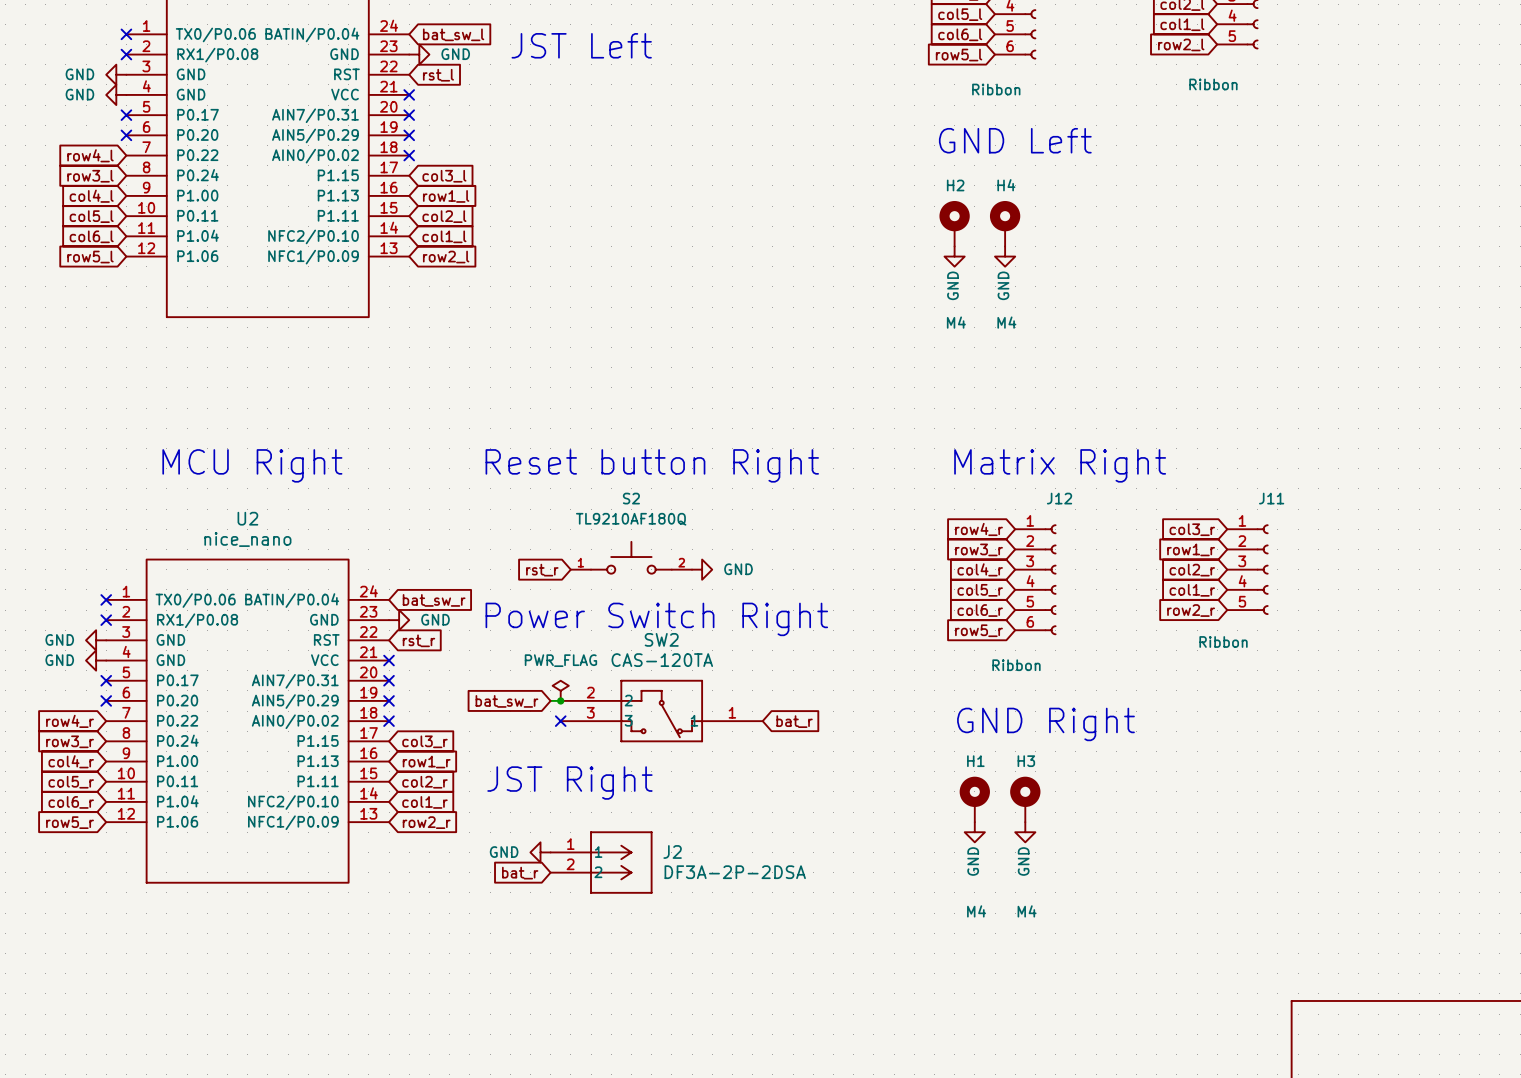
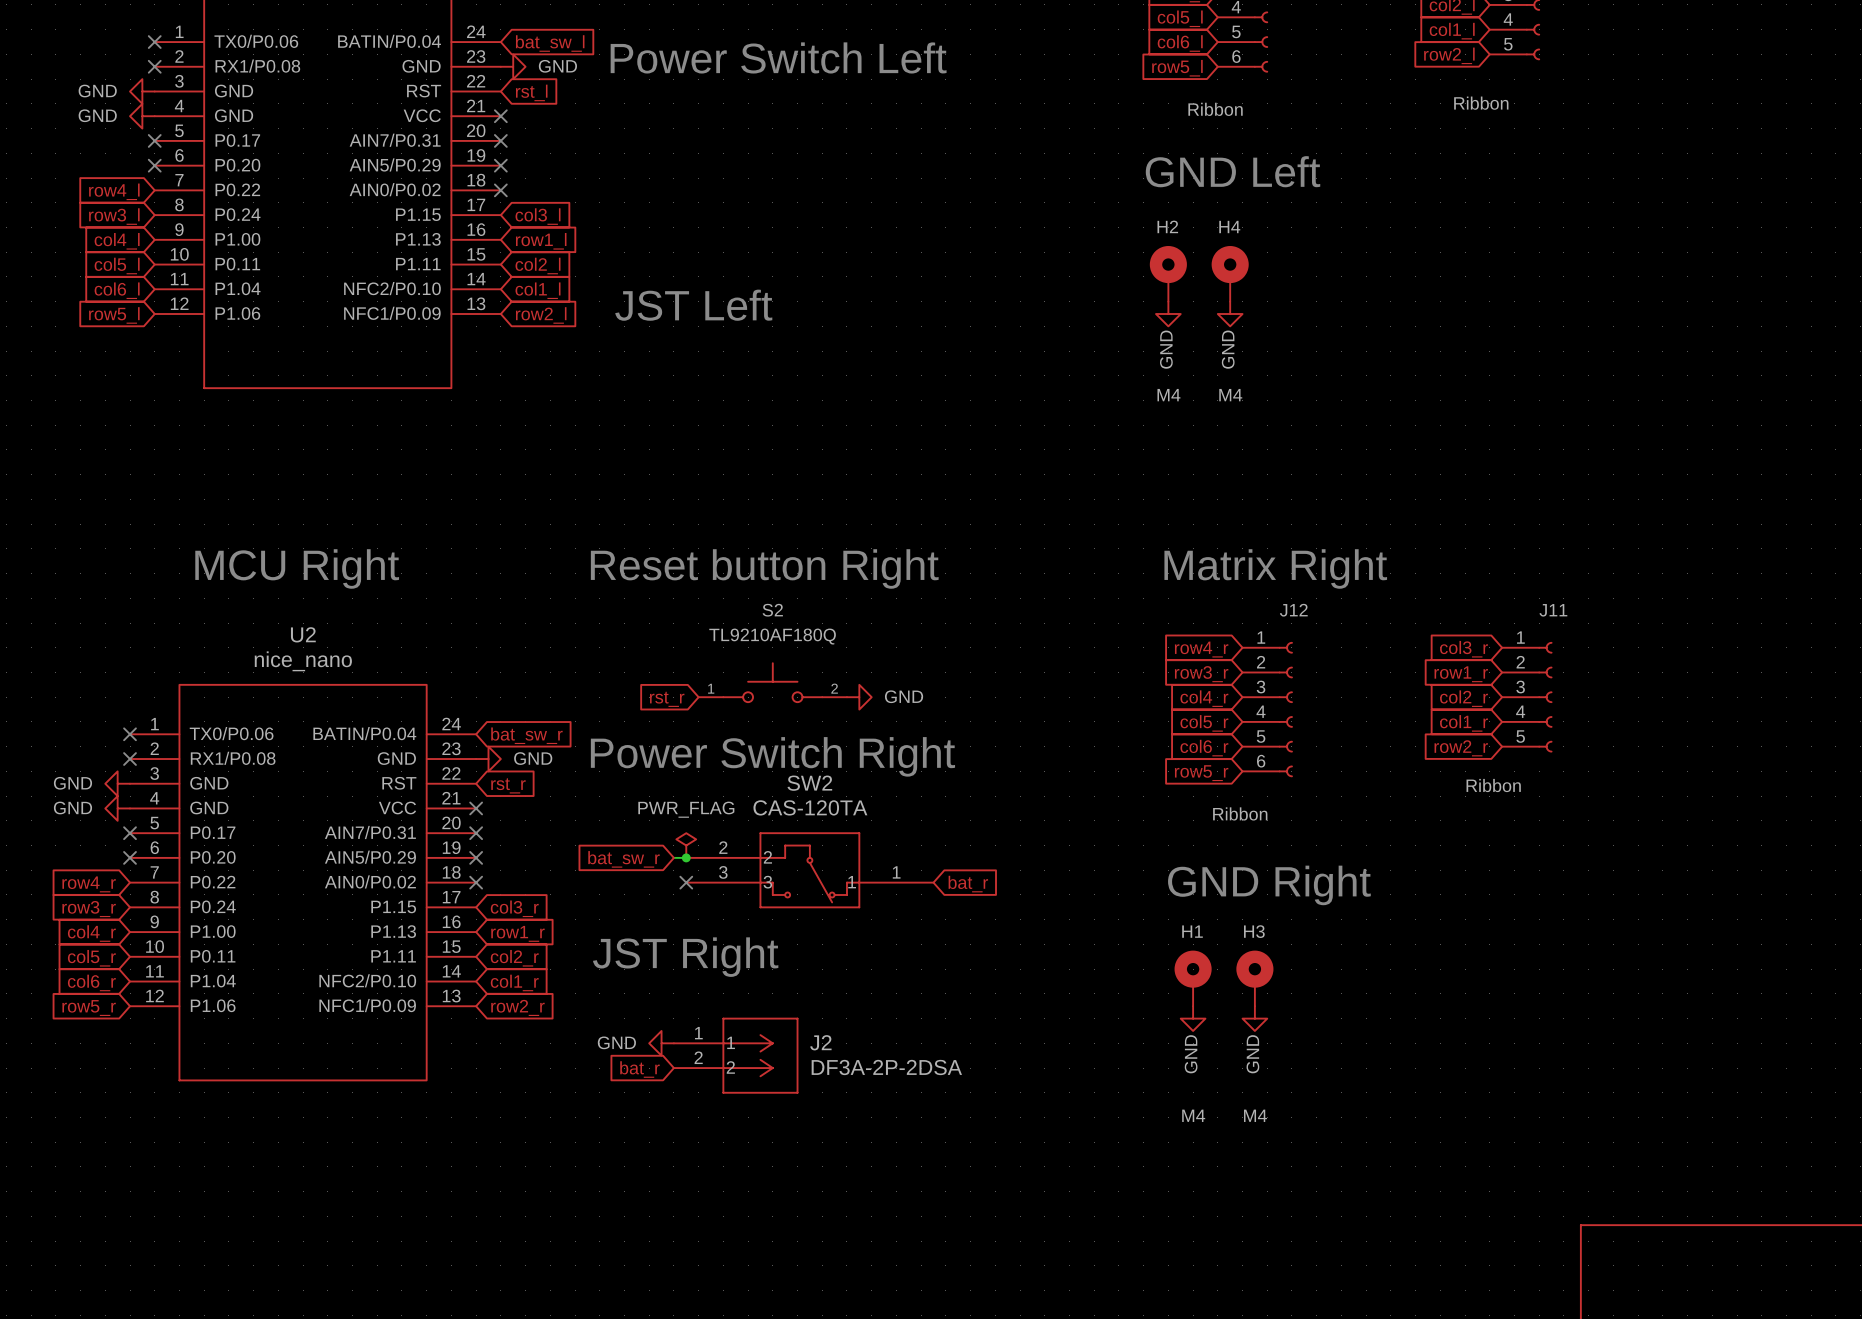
text: JST Left (581, 45) -> none
text: none -> Power Switch Left (778, 57)
text: none -> JST Left (693, 305)

